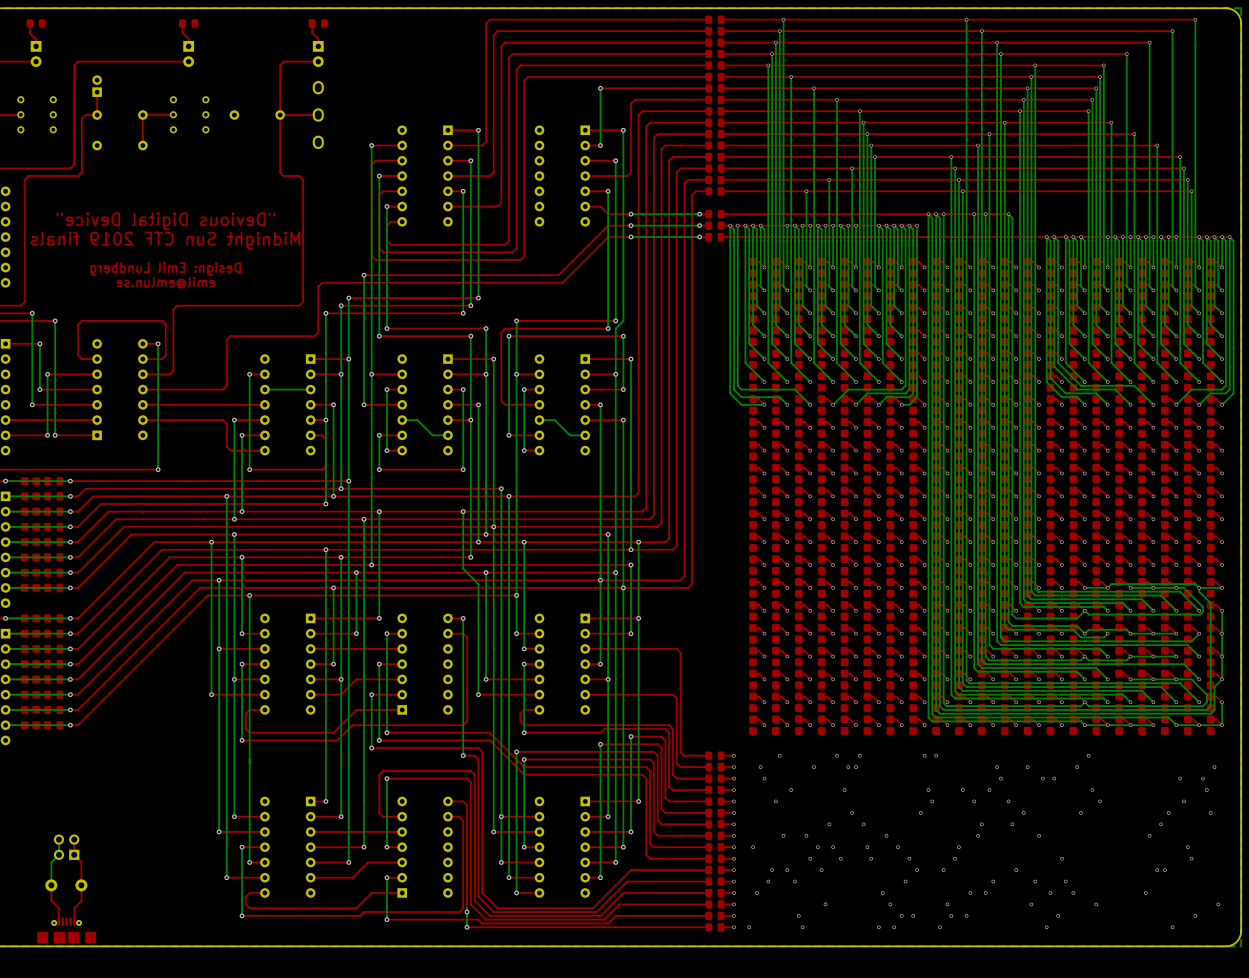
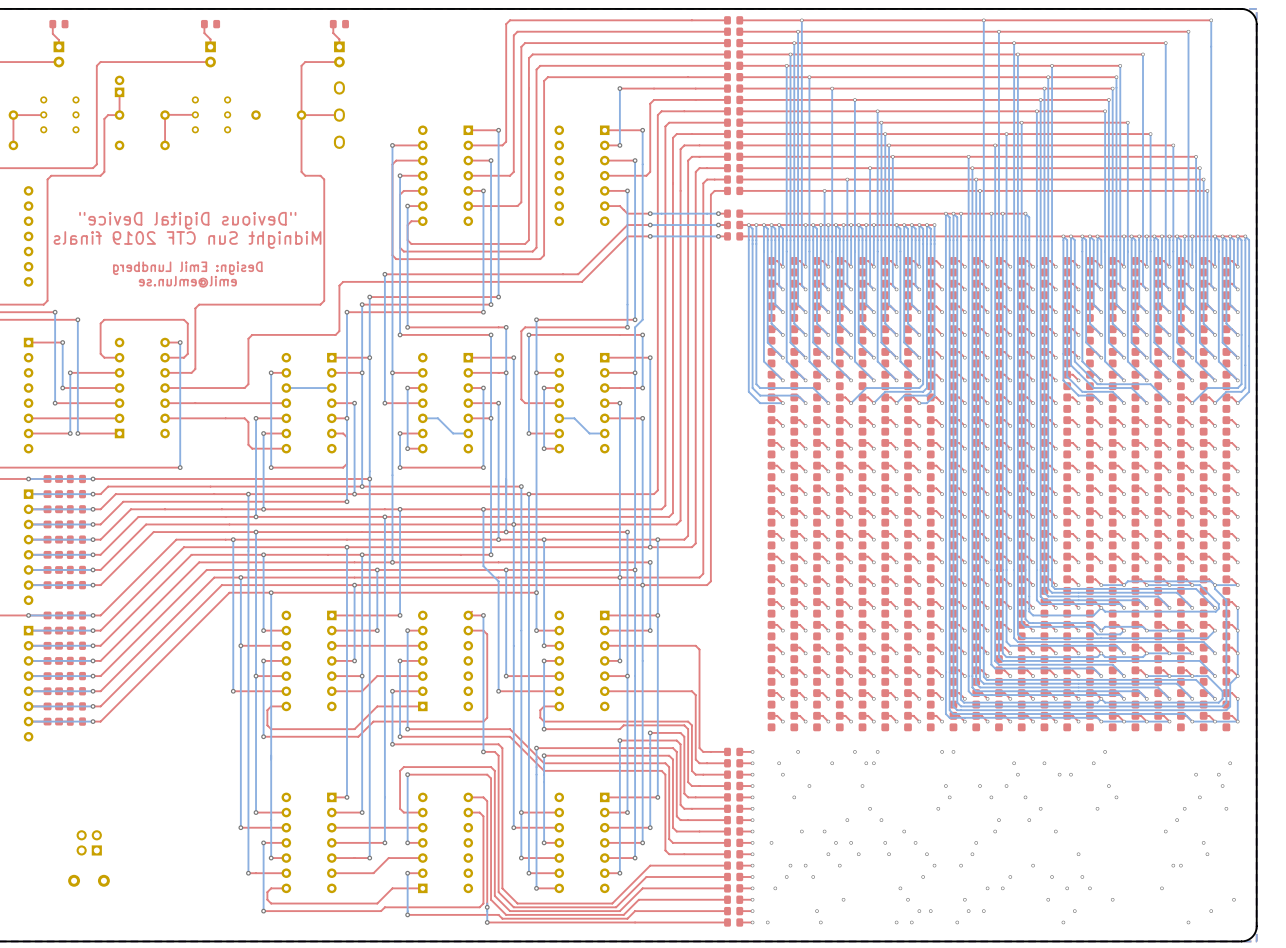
bottom track: (58, 839) (58, 854) (51, 862) (51, 885) -> none
top track: (74, 839) (74, 854) (81, 861) (81, 901) (74, 908) (74, 921) -> none
top track: (51, 885) (51, 900) (58, 908) (58, 921) -> none
part: (66, 930) -> none

